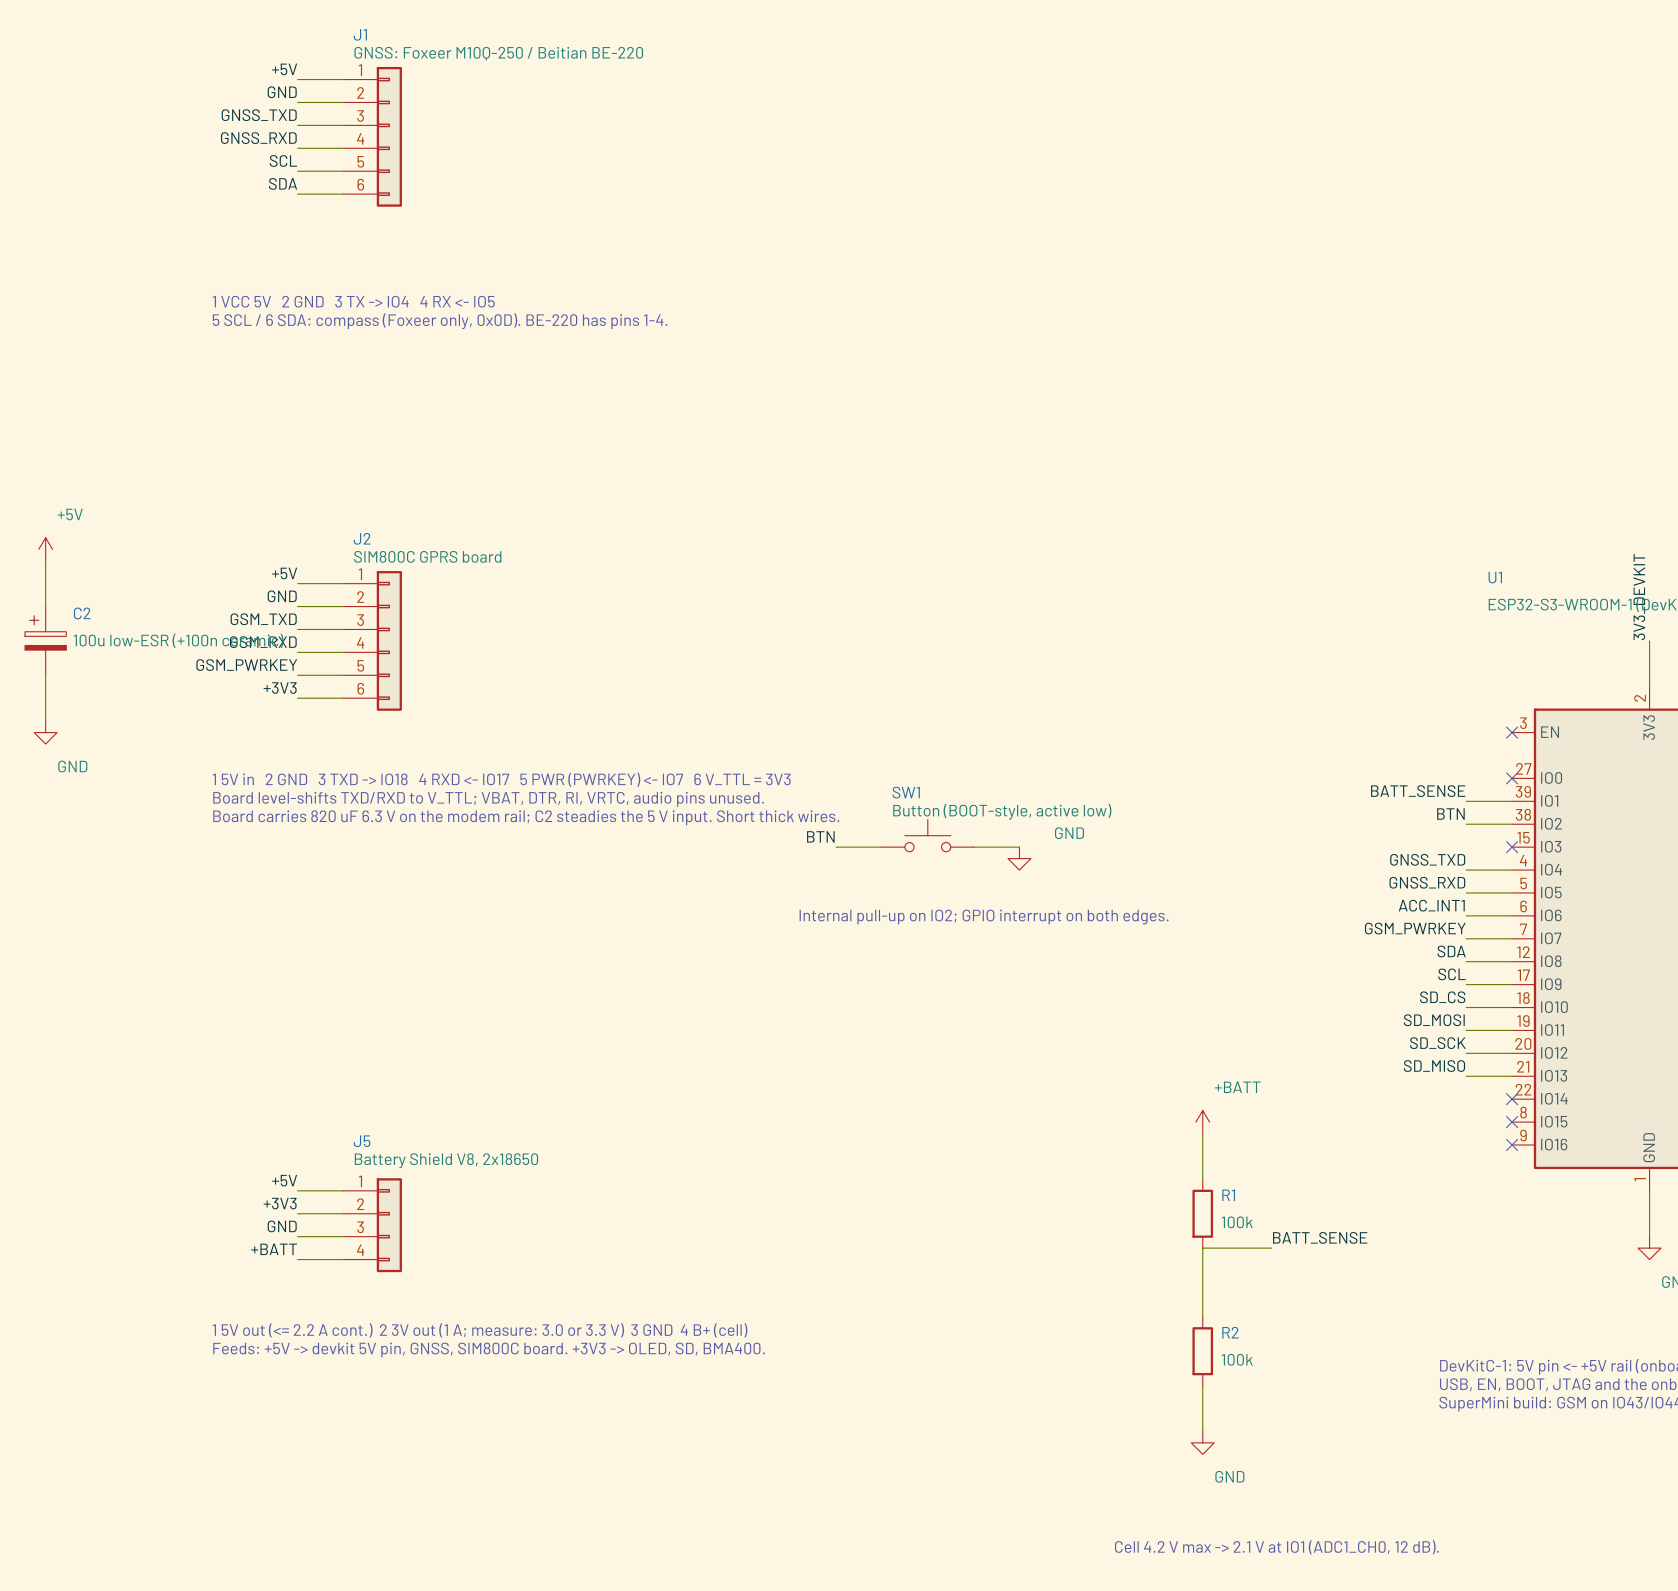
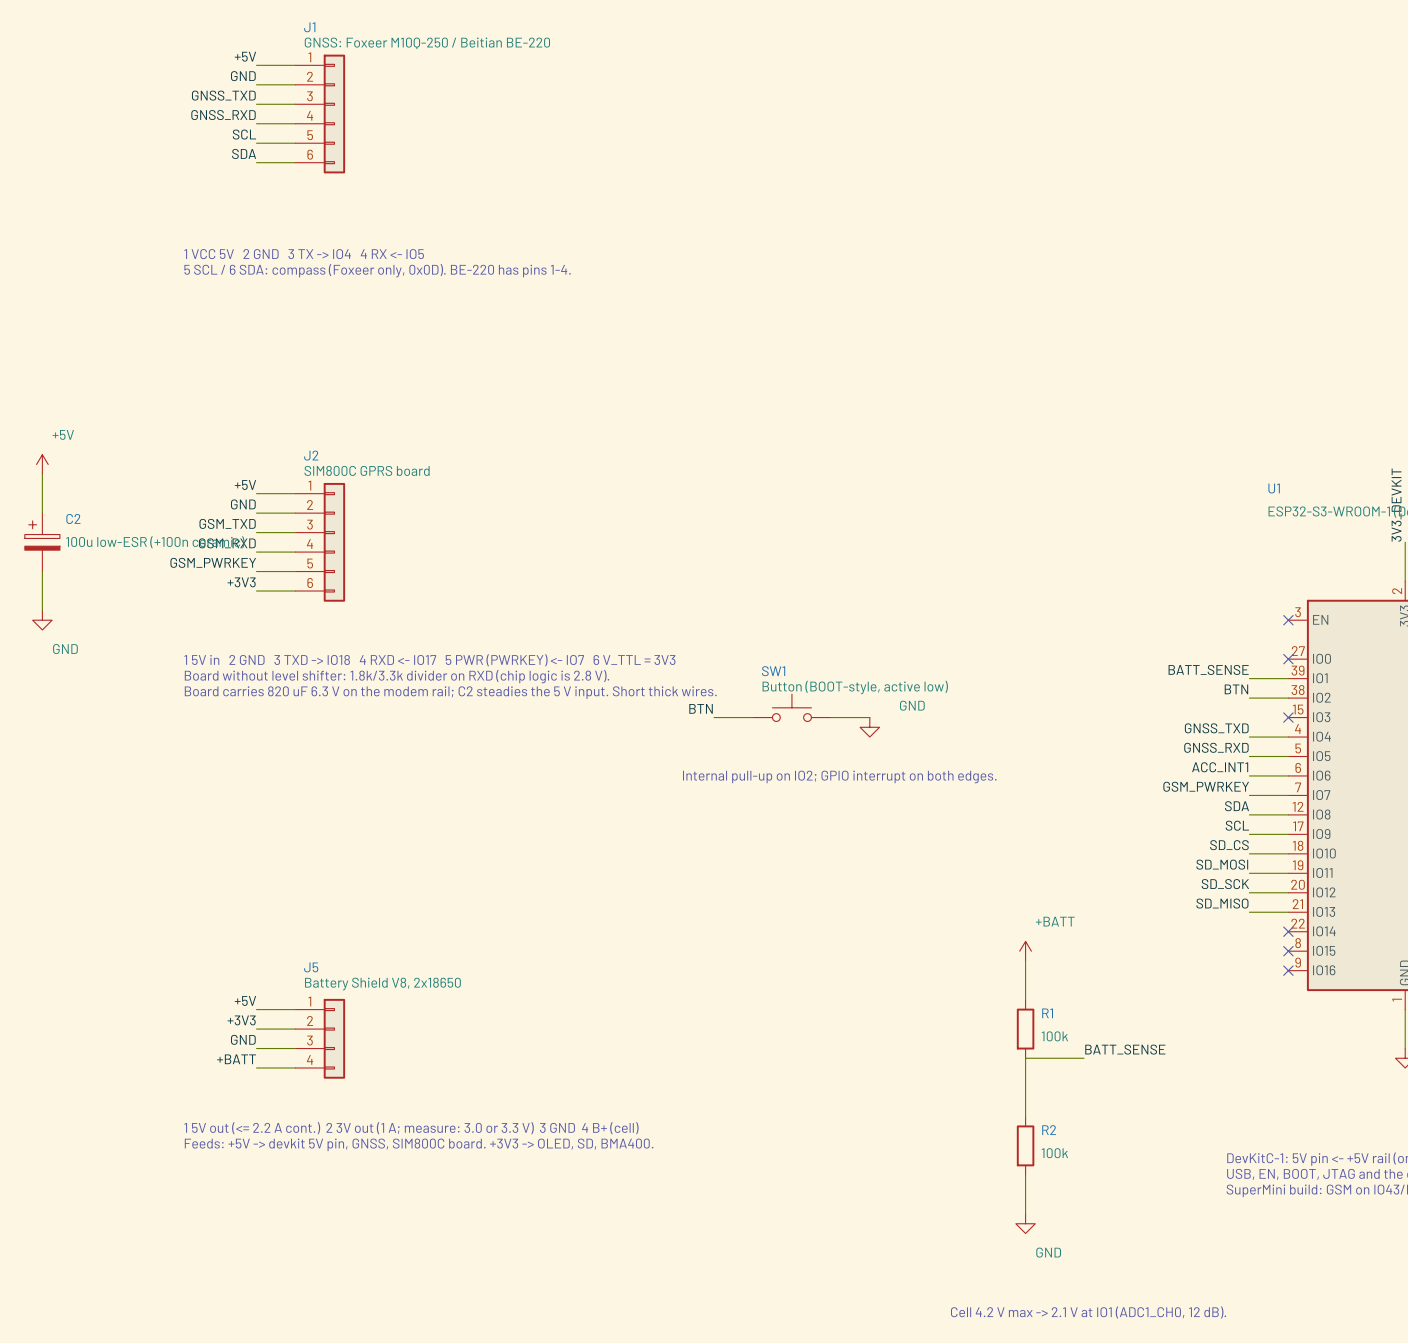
text: Board level-shifts TXD/RXD to V_TTL; VBAT, DTR, RI, VRTC, audio pins unused. (488, 799) -> Board without level shifter: 1.8k/3.3k divider on RXD (chip logic is 2.8 V). (397, 676)

